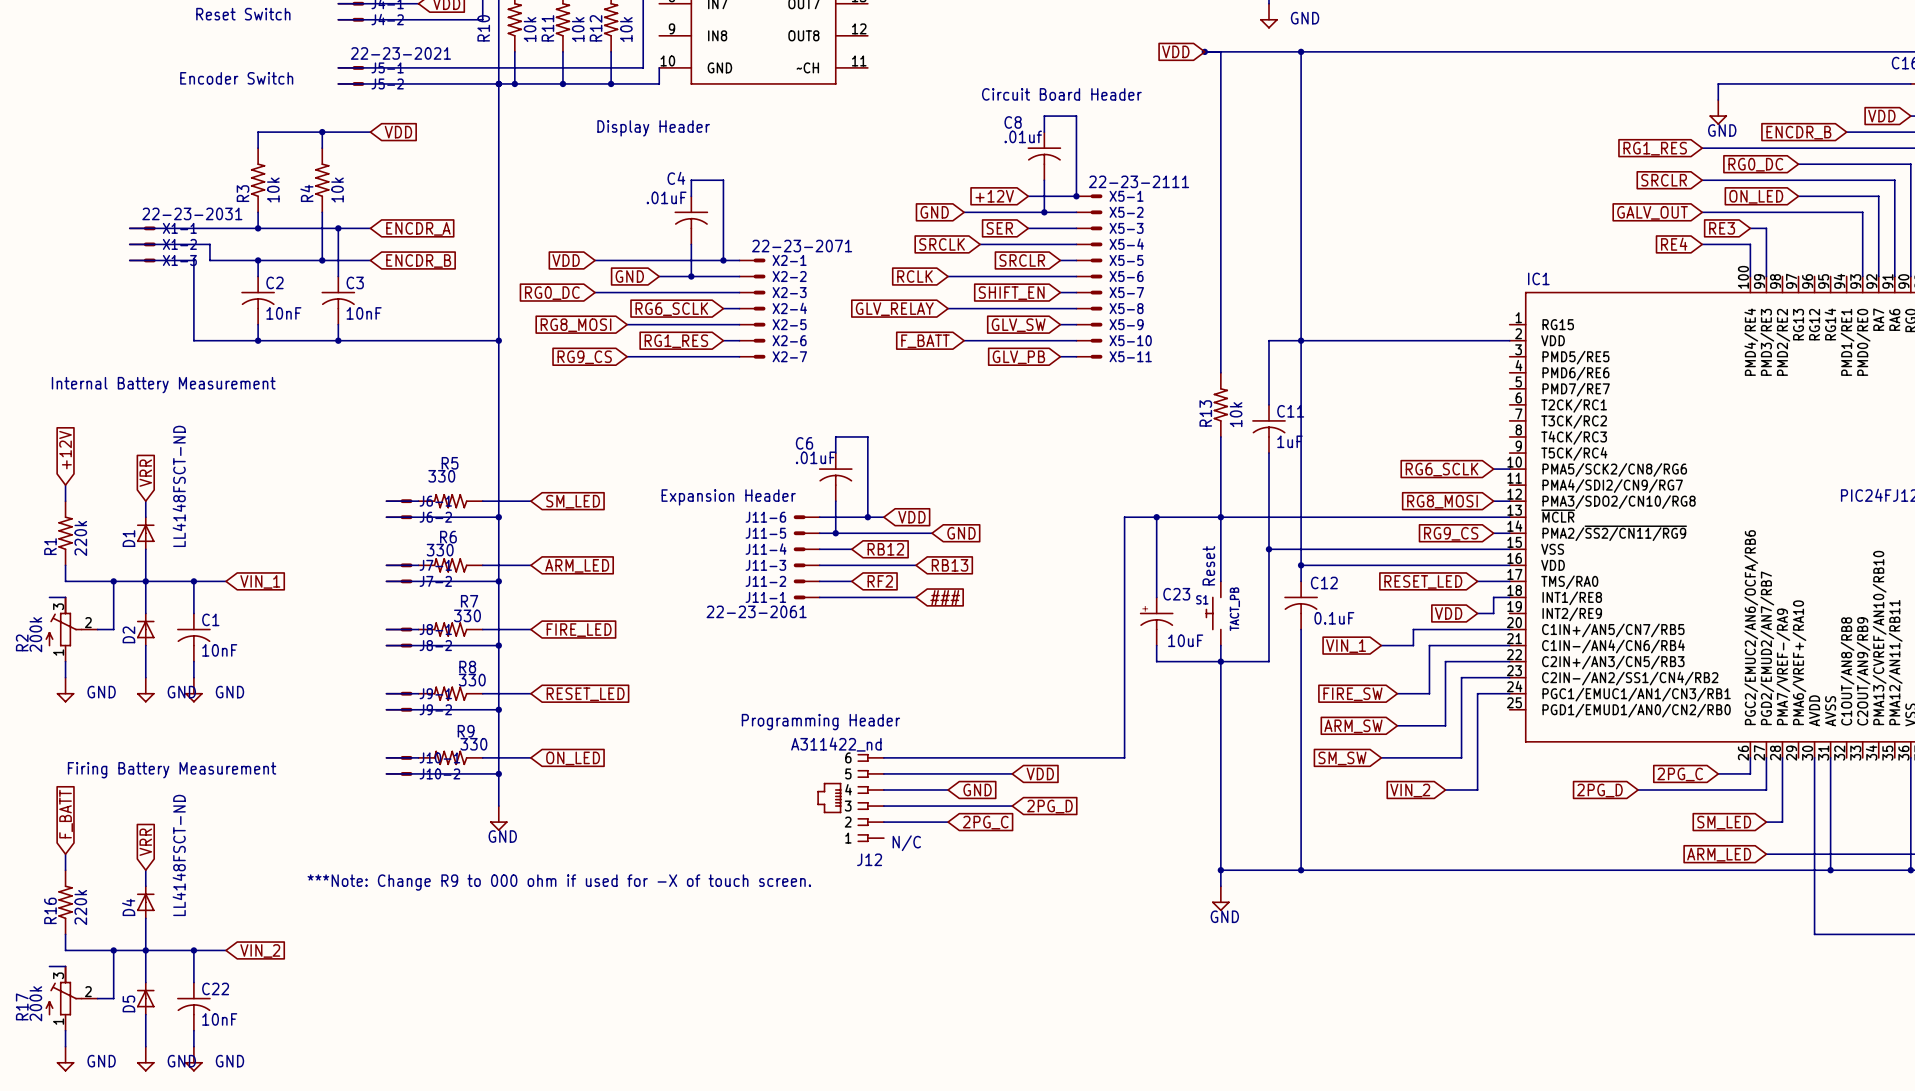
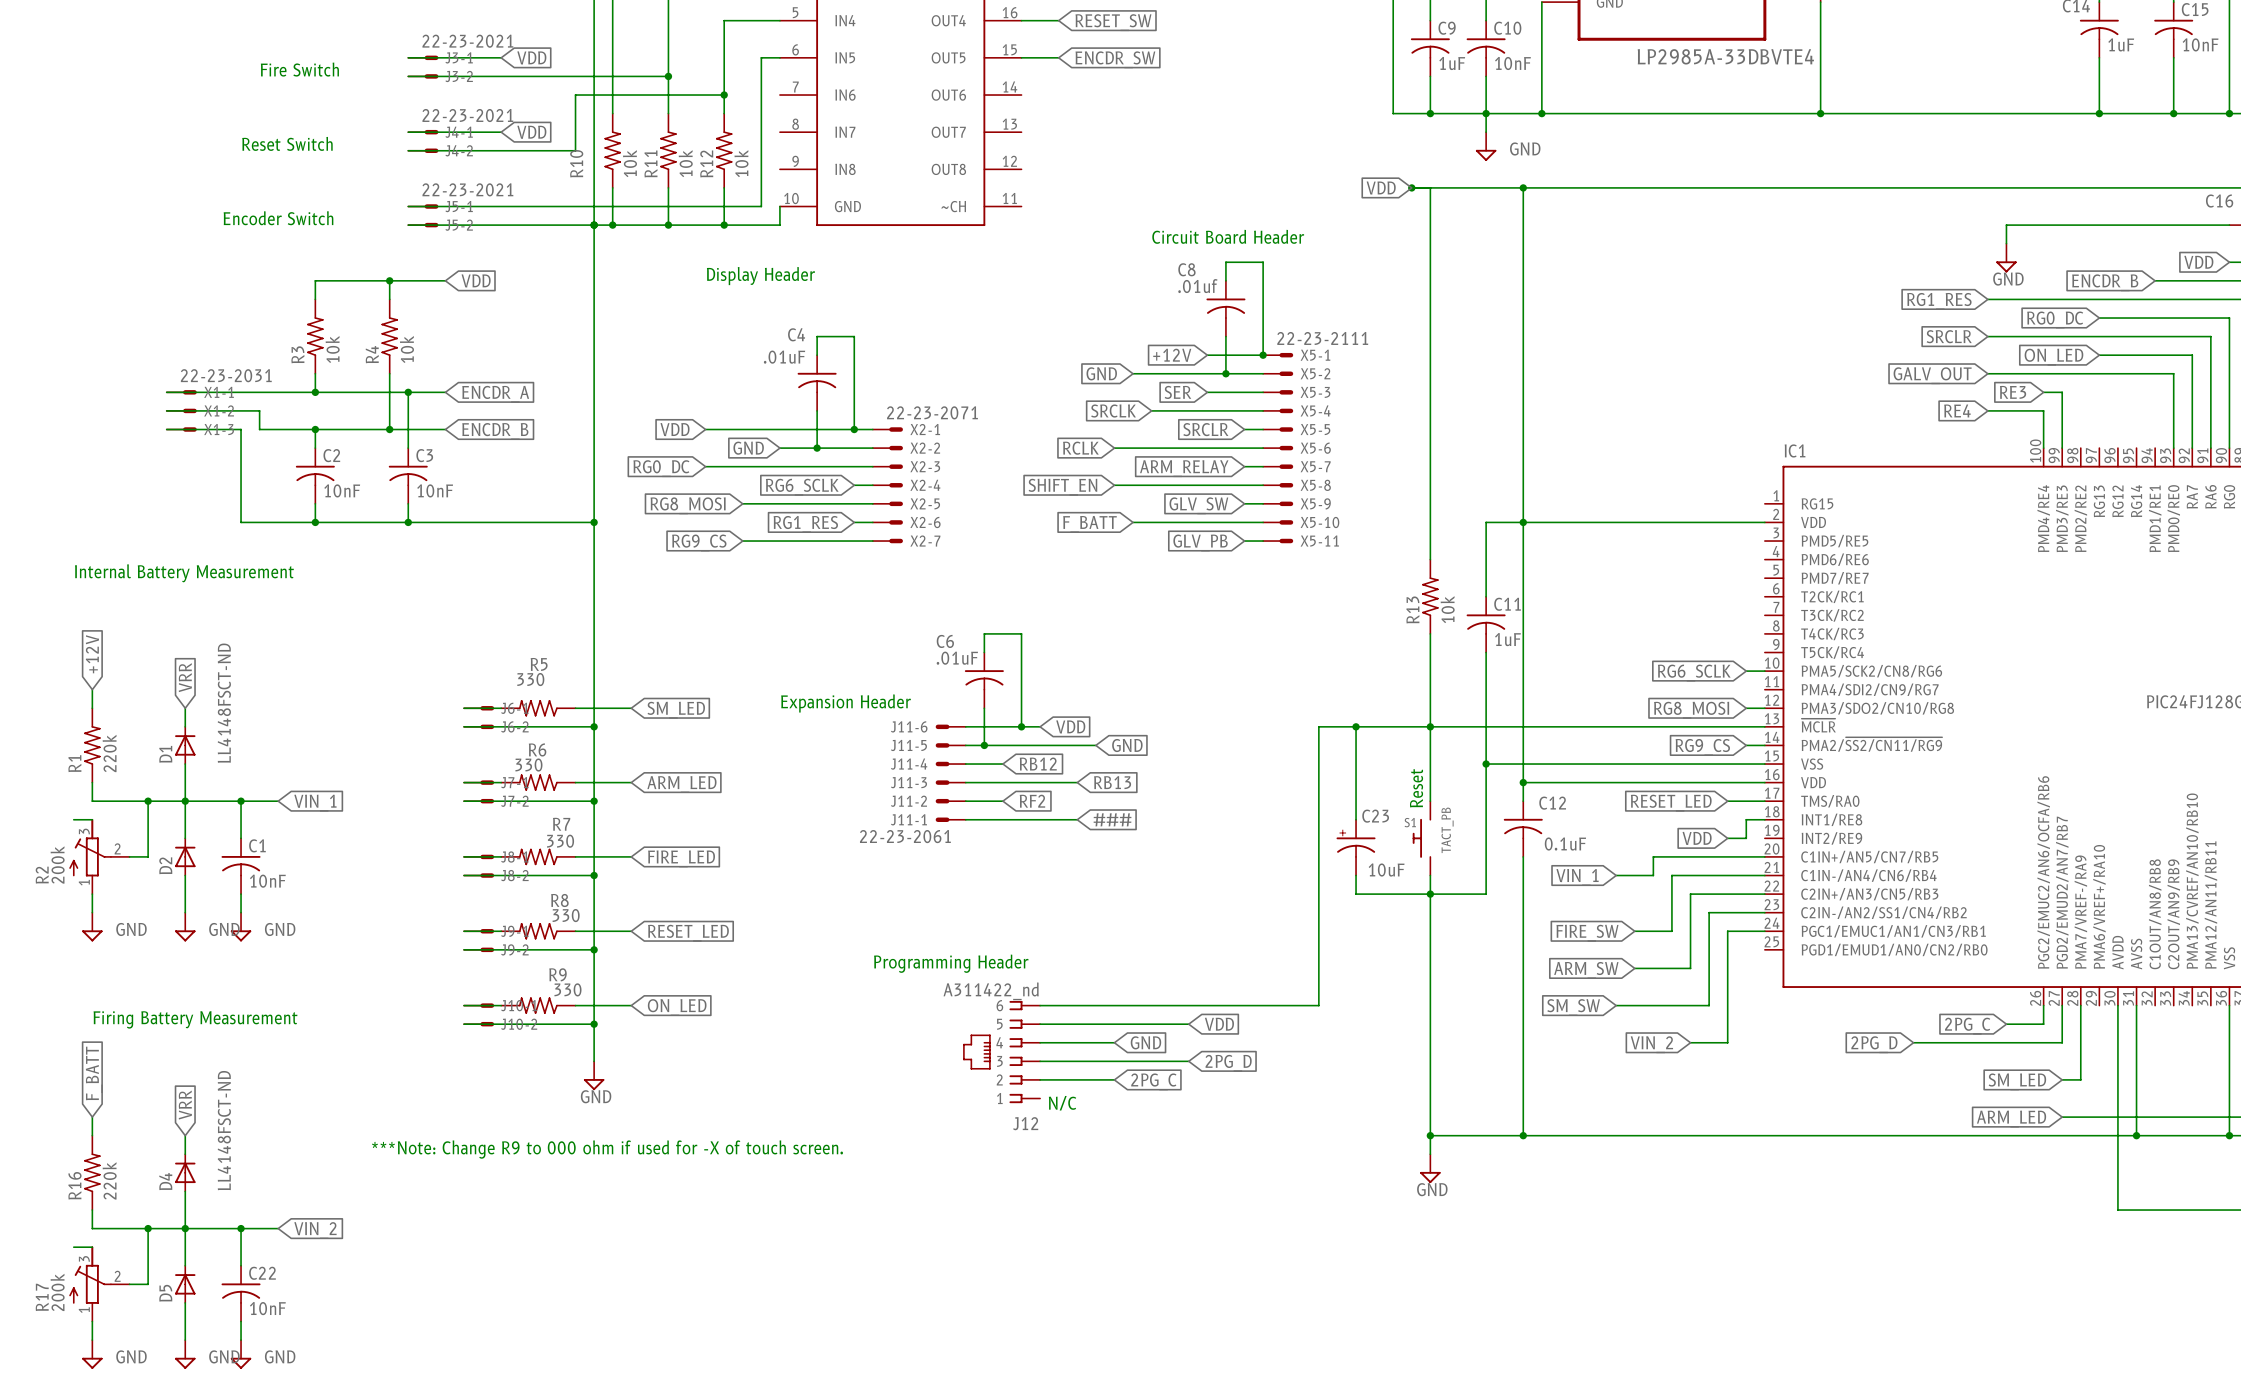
global label: SHIFT_EN (1011, 293) -> ARM_RELAY (1184, 468)
global label: GLV_RELAY (894, 309) -> SHIFT_EN (1062, 487)

